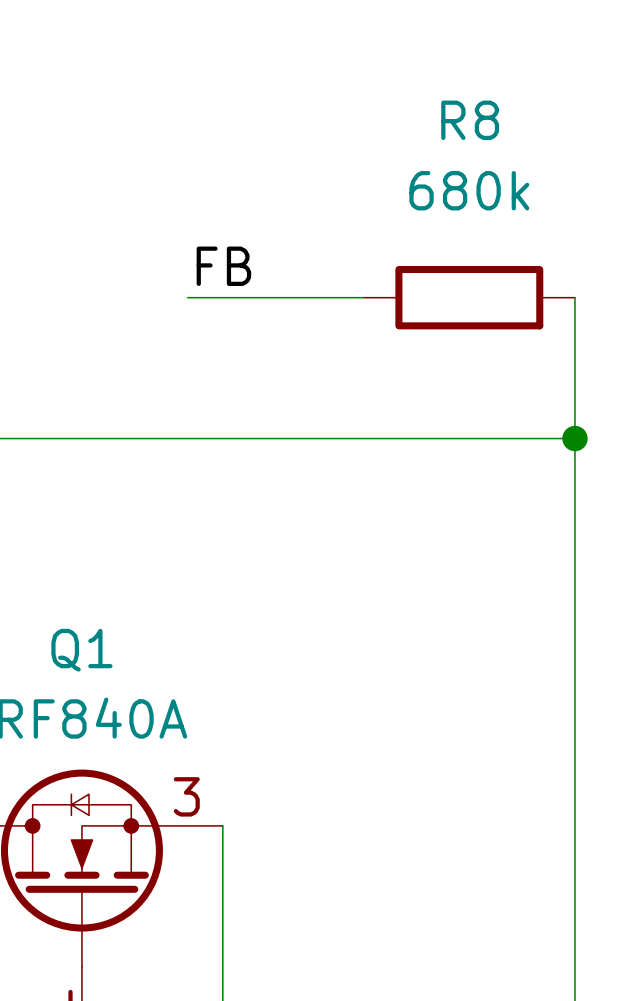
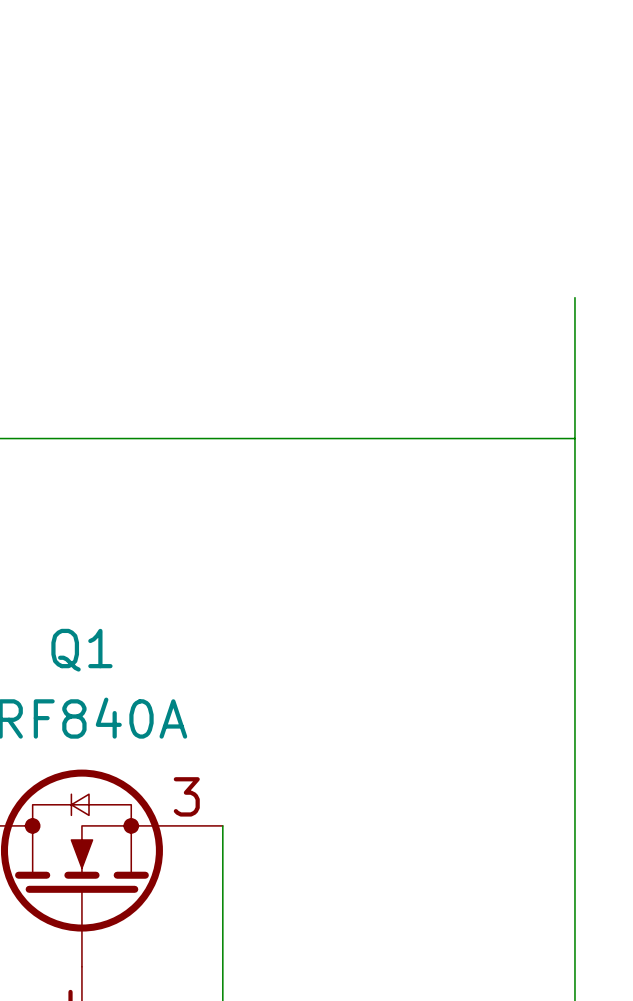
label: FB (223, 266) -> none
wire: (187, 297) (363, 297) -> none
R8: 680k (469, 297) -> none
junction: (574, 438) -> none

